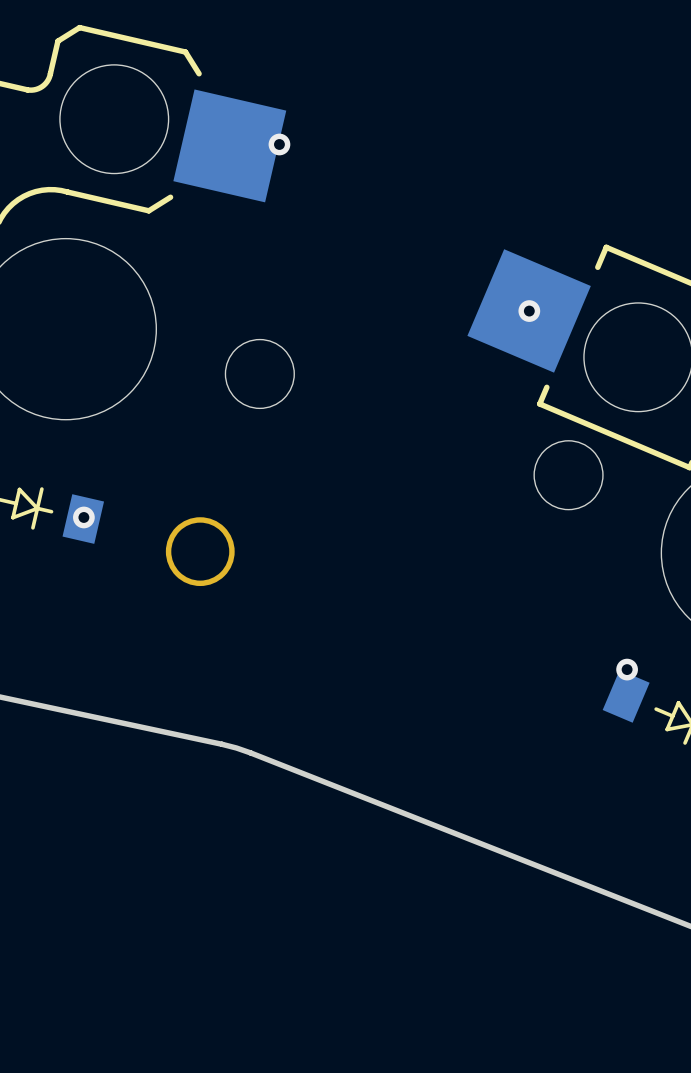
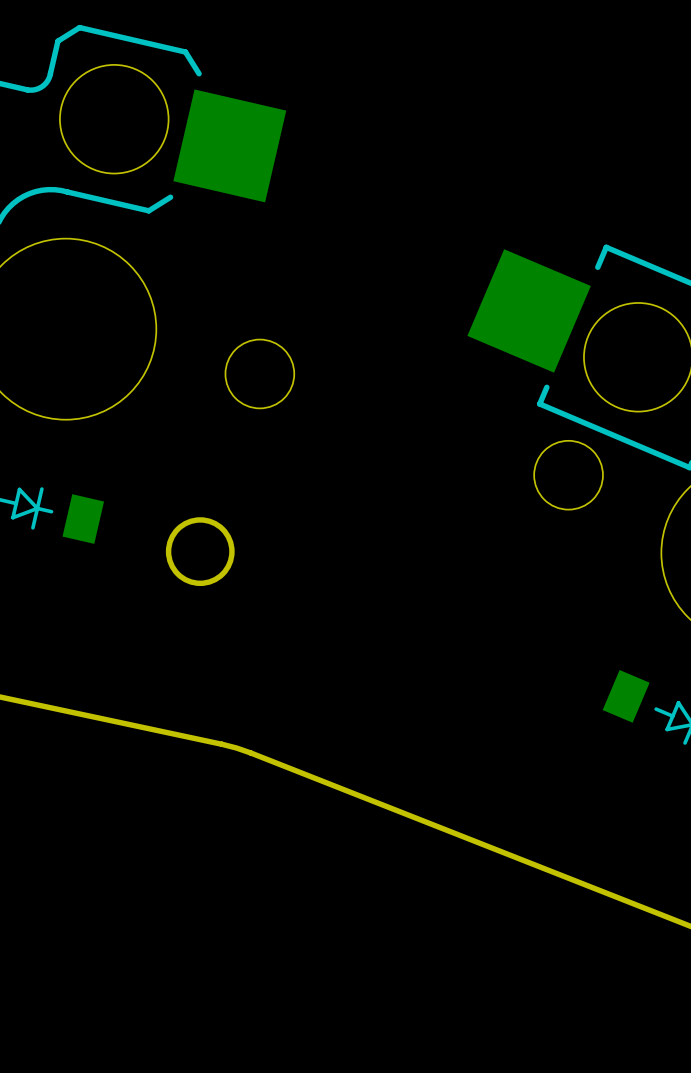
via: (279, 144) -> none
via: (529, 311) -> none
via: (83, 517) -> none
via: (627, 669) -> none

